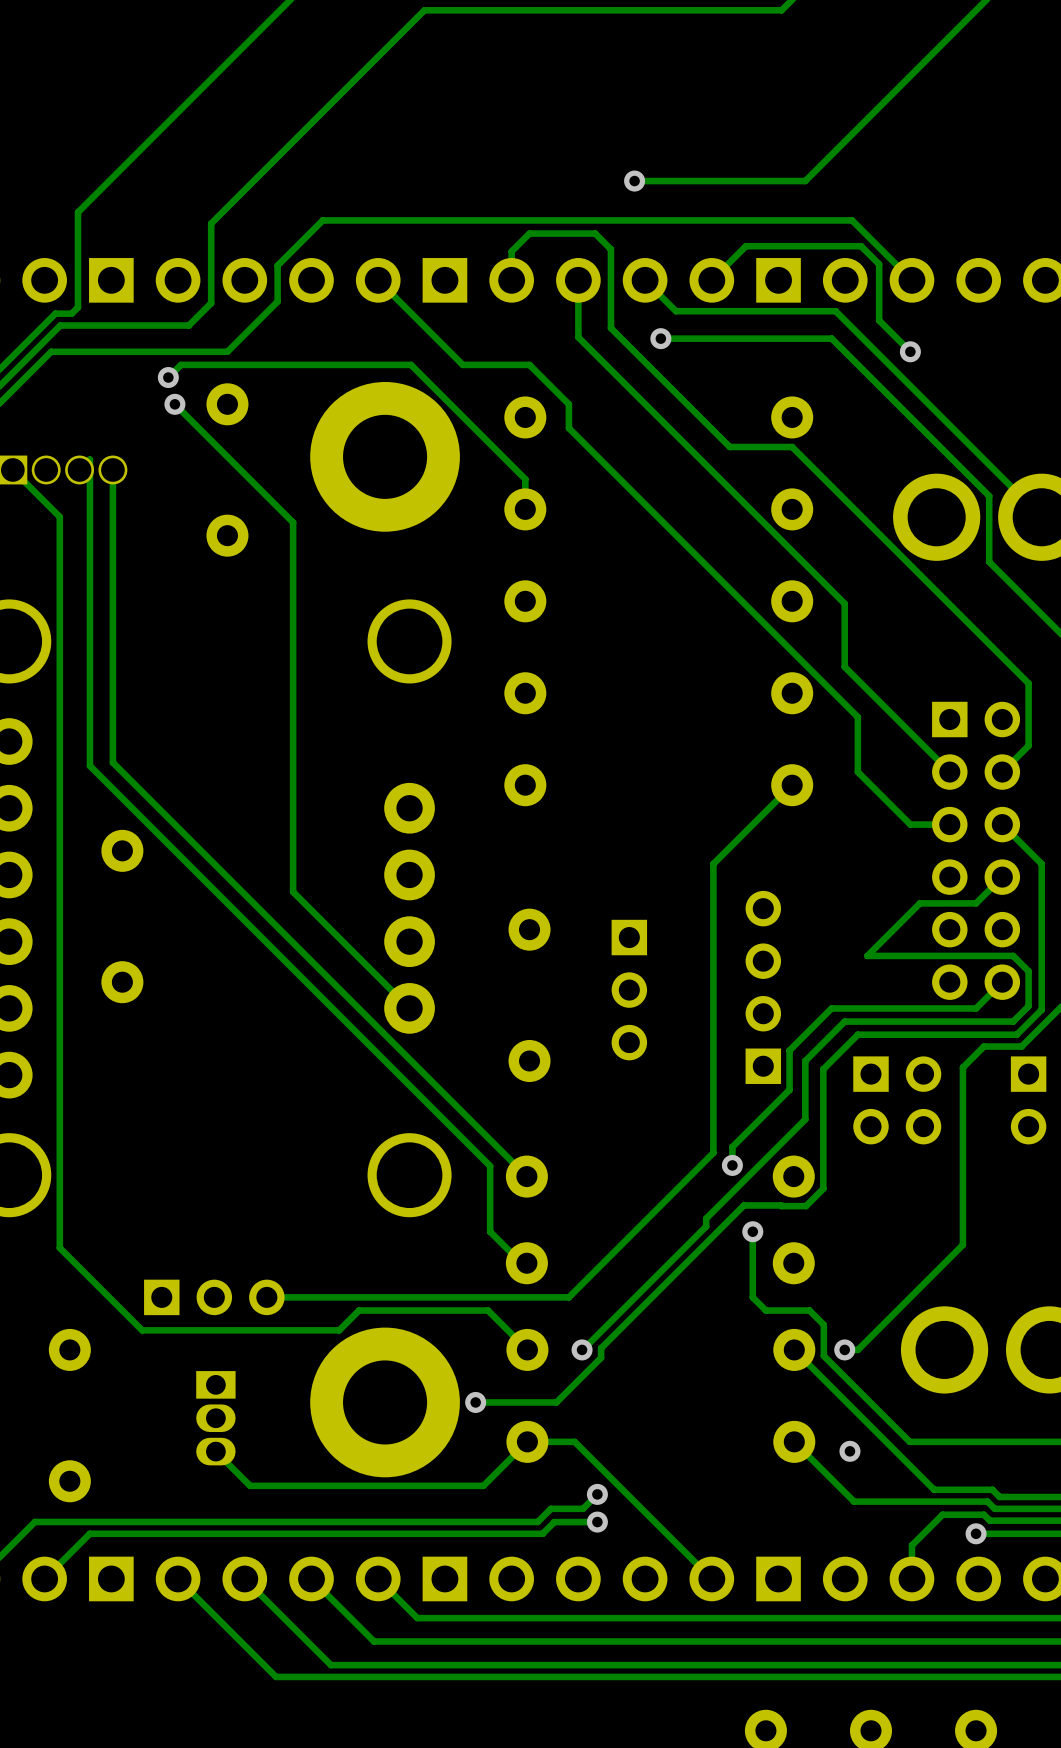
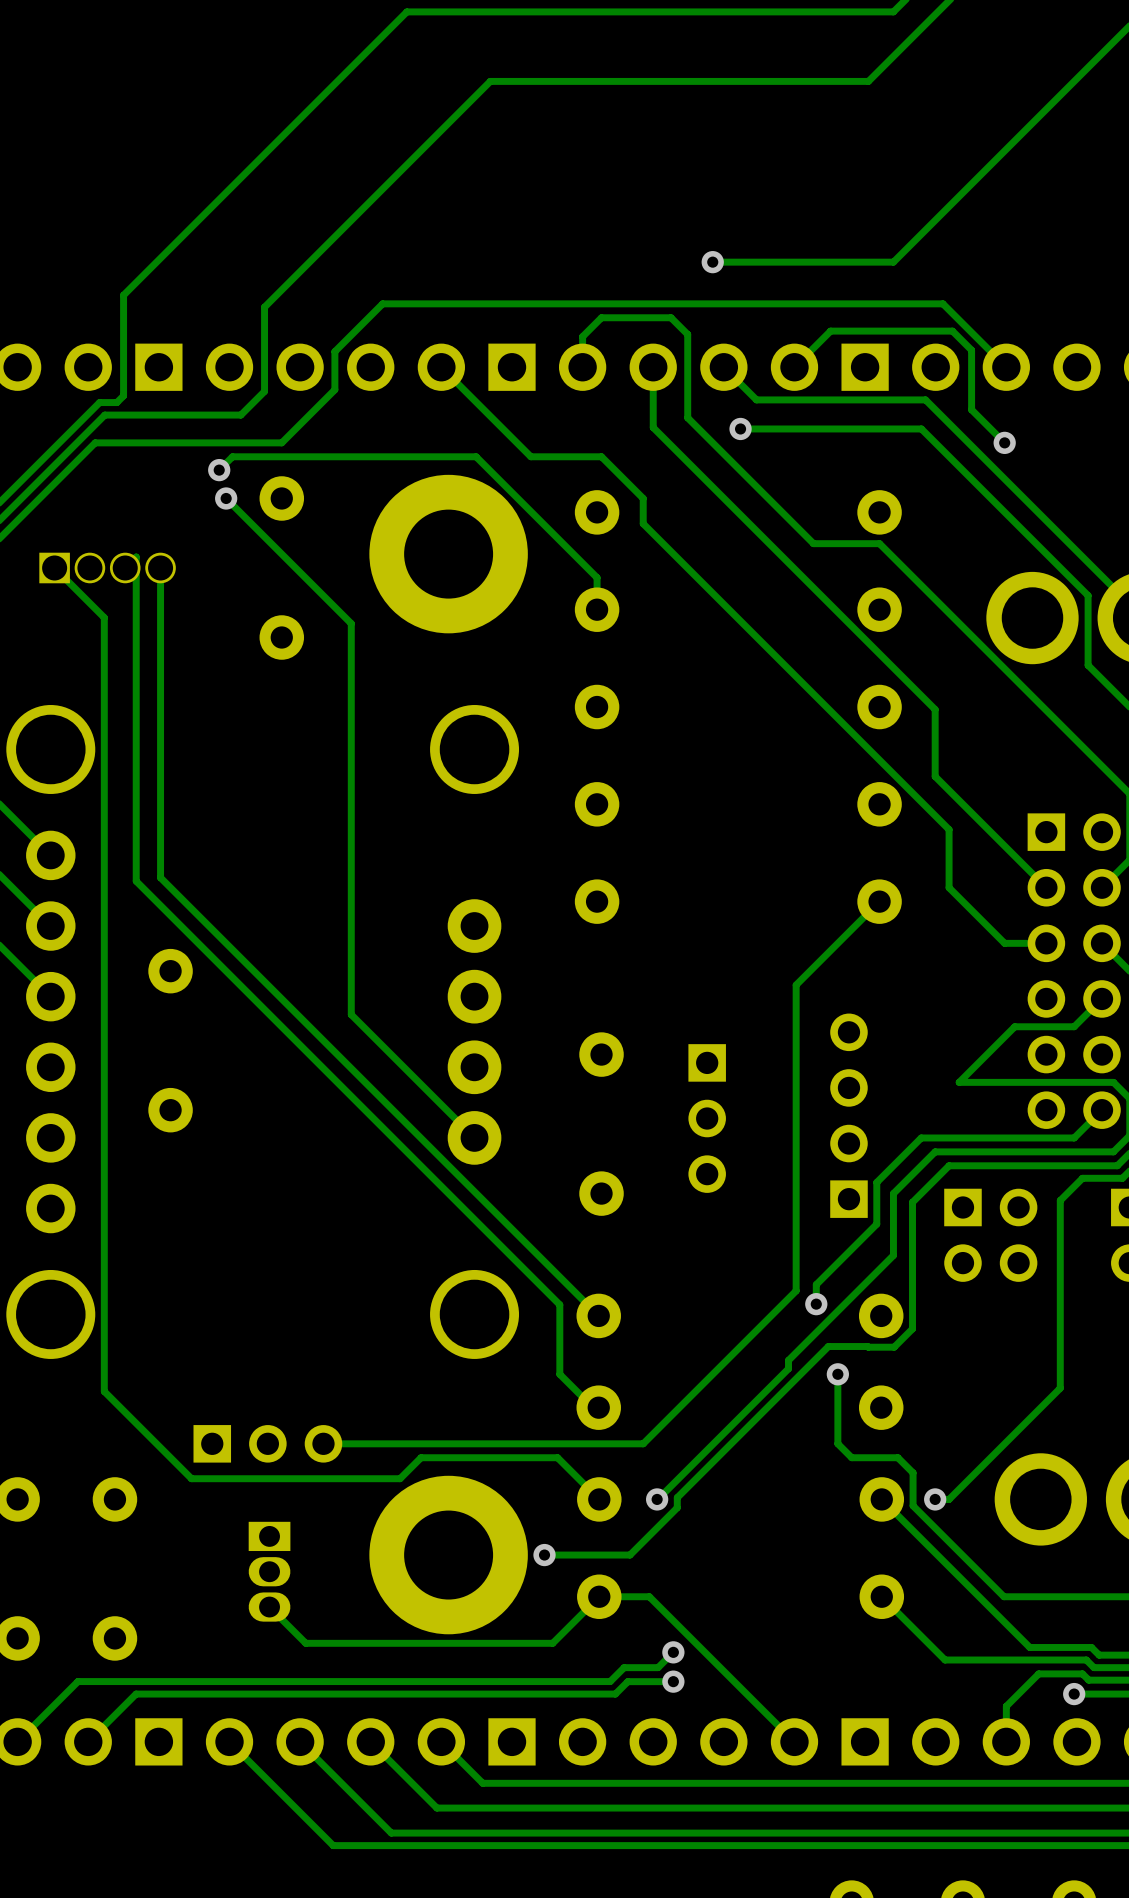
via: (849, 1451) -> none

